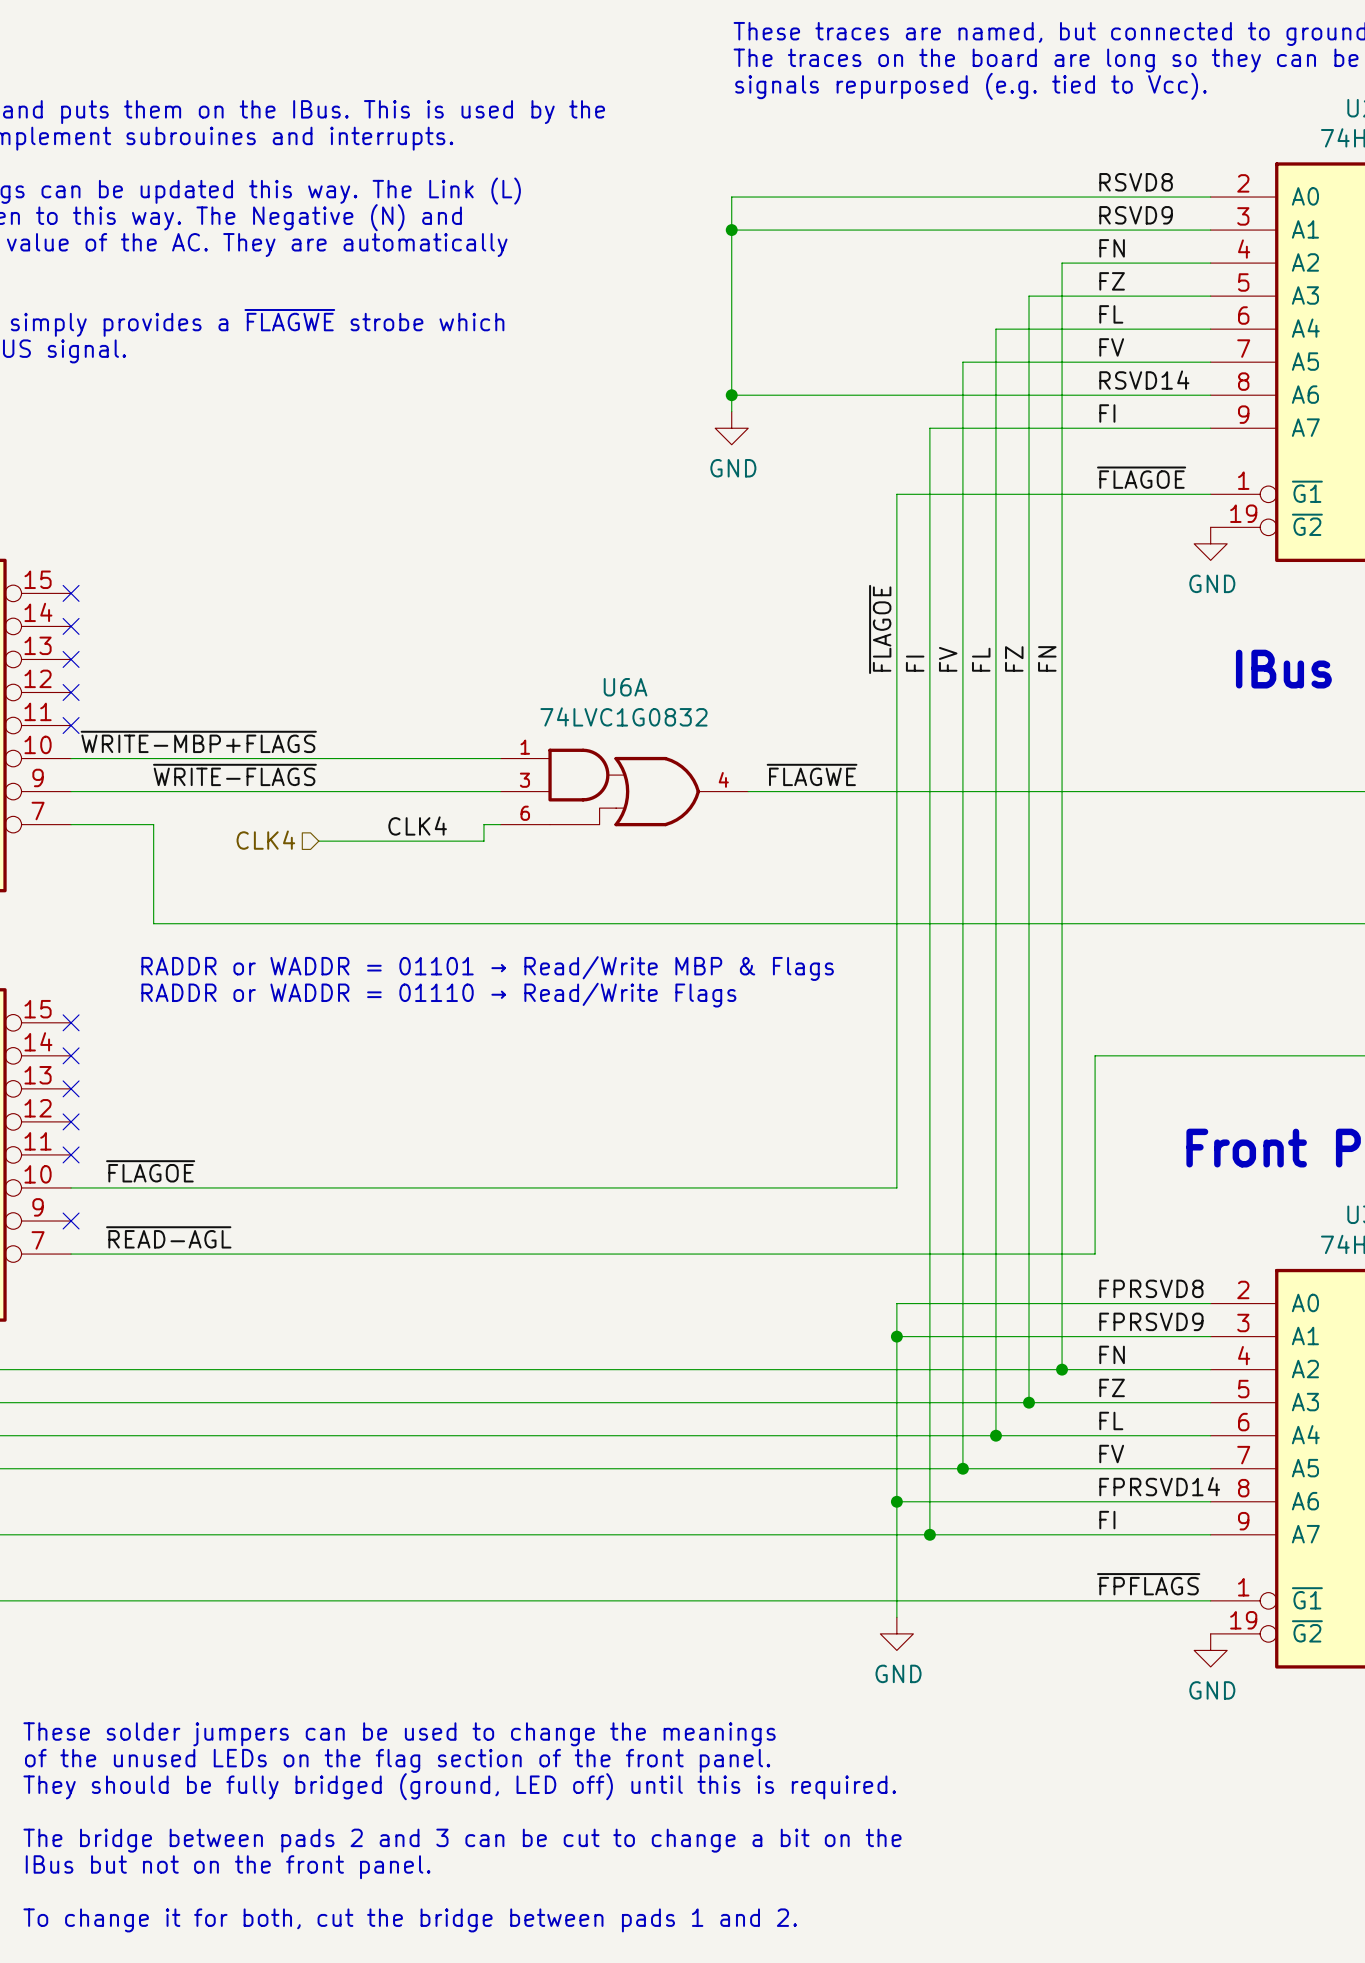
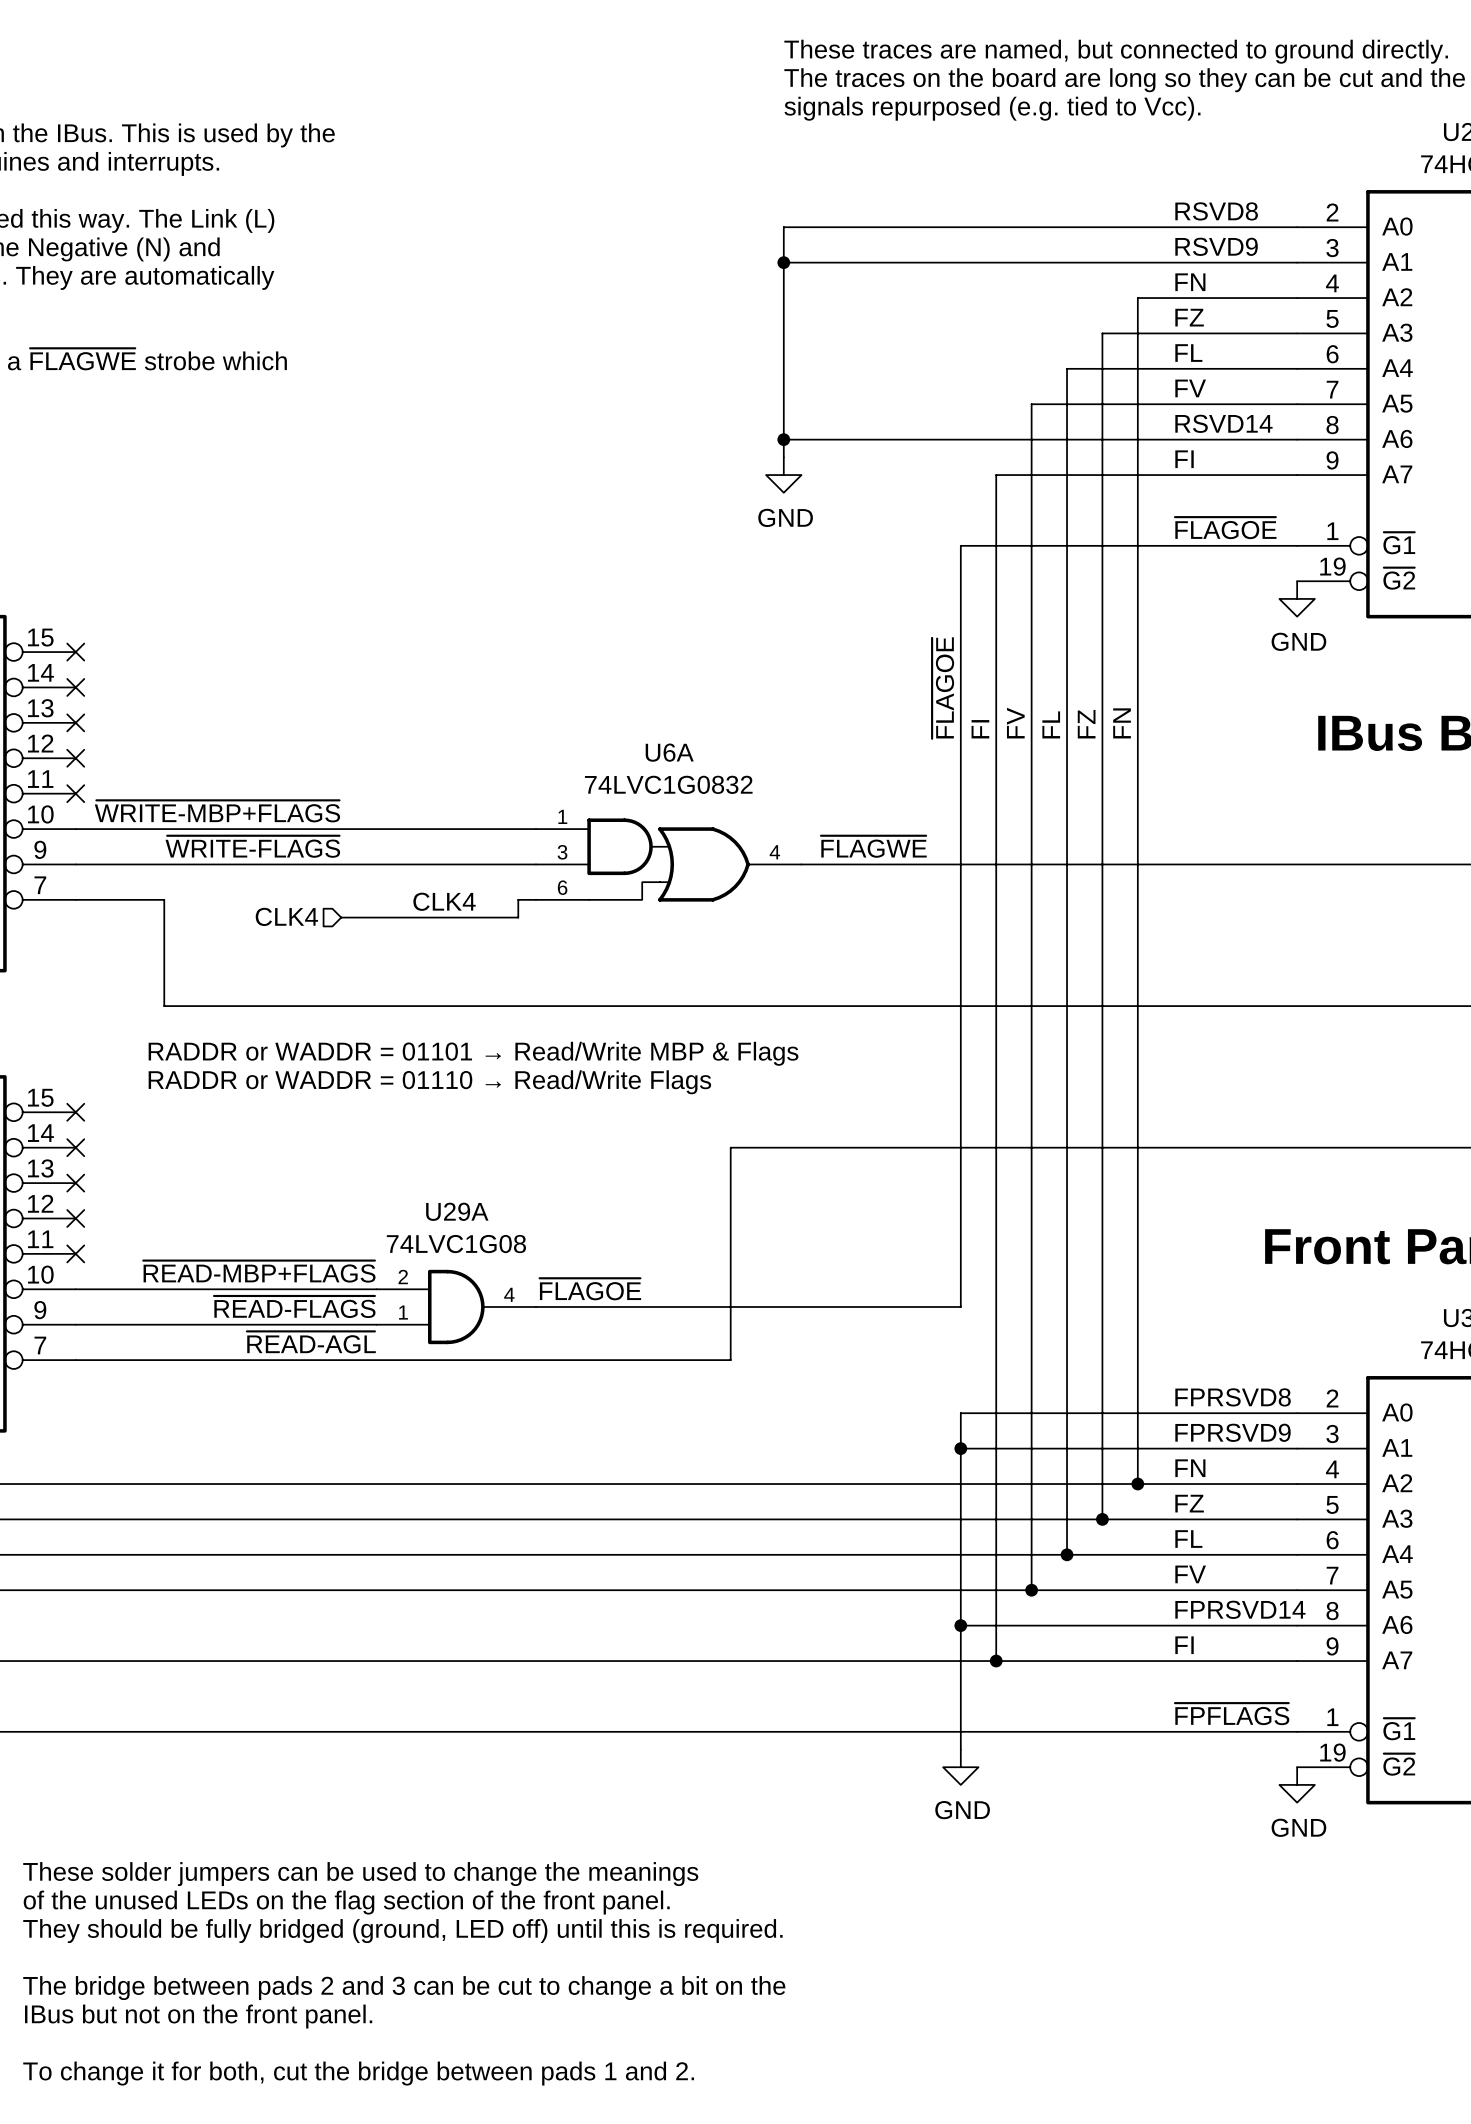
wire: (1095, 1055) (1095, 1254) (682, 1254) -> (1173, 1147) (730, 1147) (730, 1360)
label: ~{FLAGOE} (150, 1171) -> ~{READ-FLAGS} (294, 1306)
label: none -> ~{READ-MBP+FLAGS} (259, 1271)
wire: (351, 1187) (896, 1187) -> (535, 1307) (960, 1307) (960, 1289)
label: none -> ~{FLAGOE} (590, 1289)
U29A: none -> 74LVC1G08 (456, 1307)
wire: none -> (75, 1324) (376, 1324)
no-connect mark: (71, 1221) -> none
label position: ~{READ-AGL} (168, 1237) -> ~{READ-AGL} (311, 1342)

